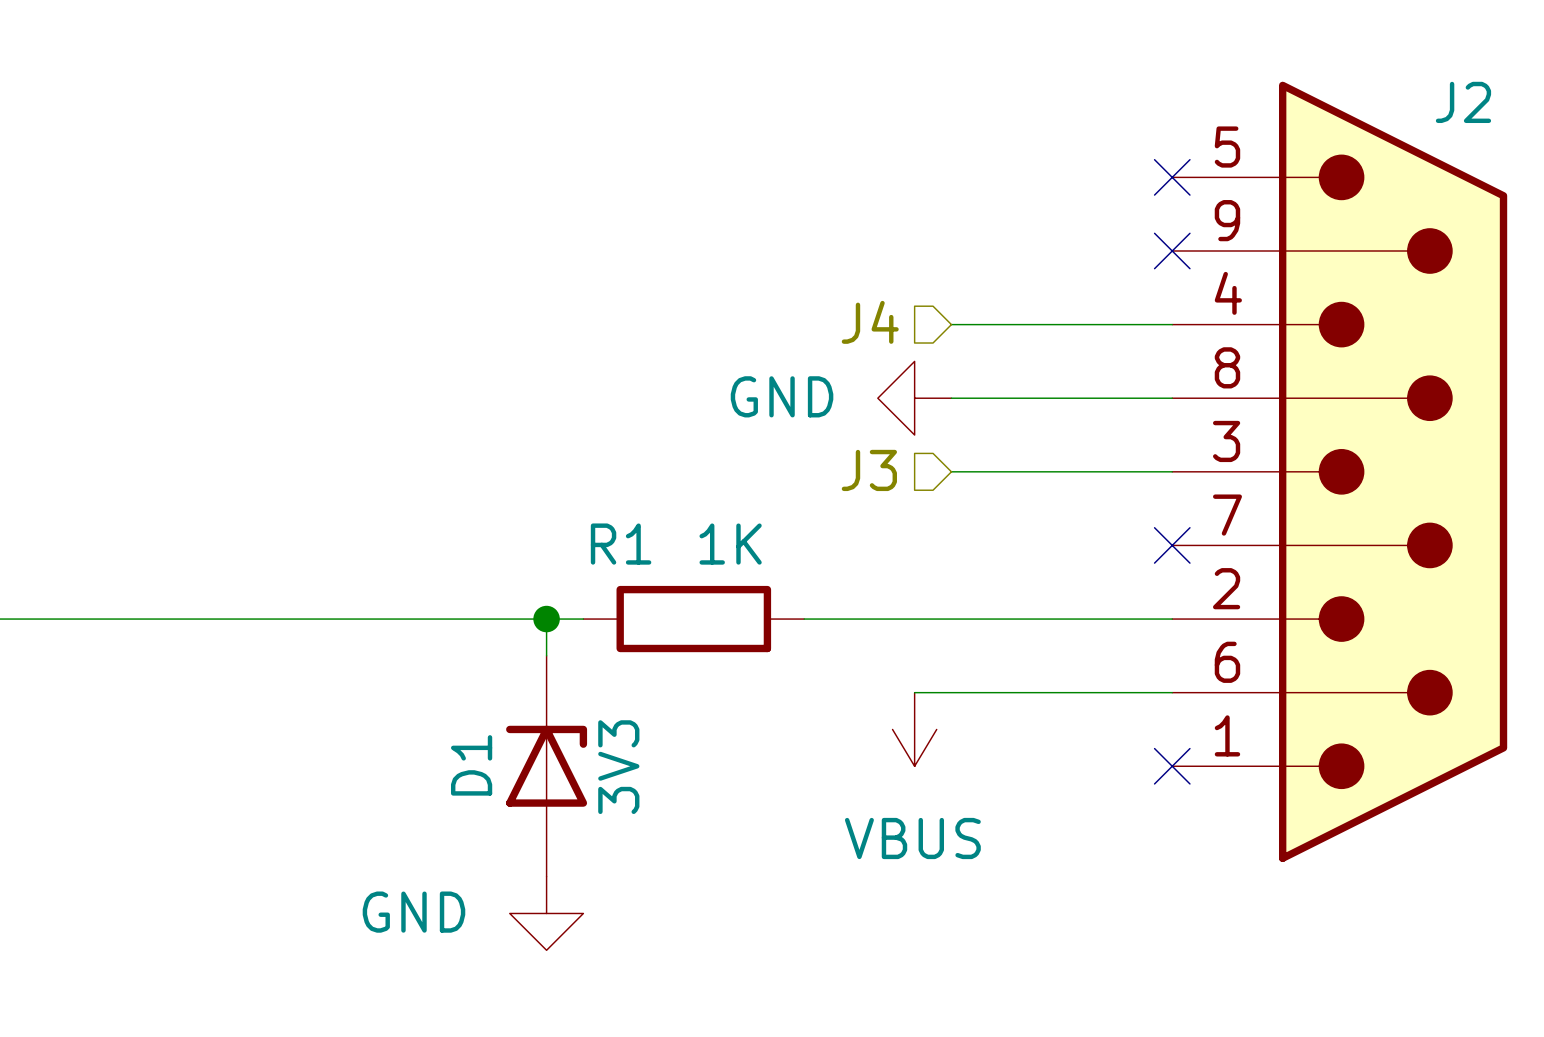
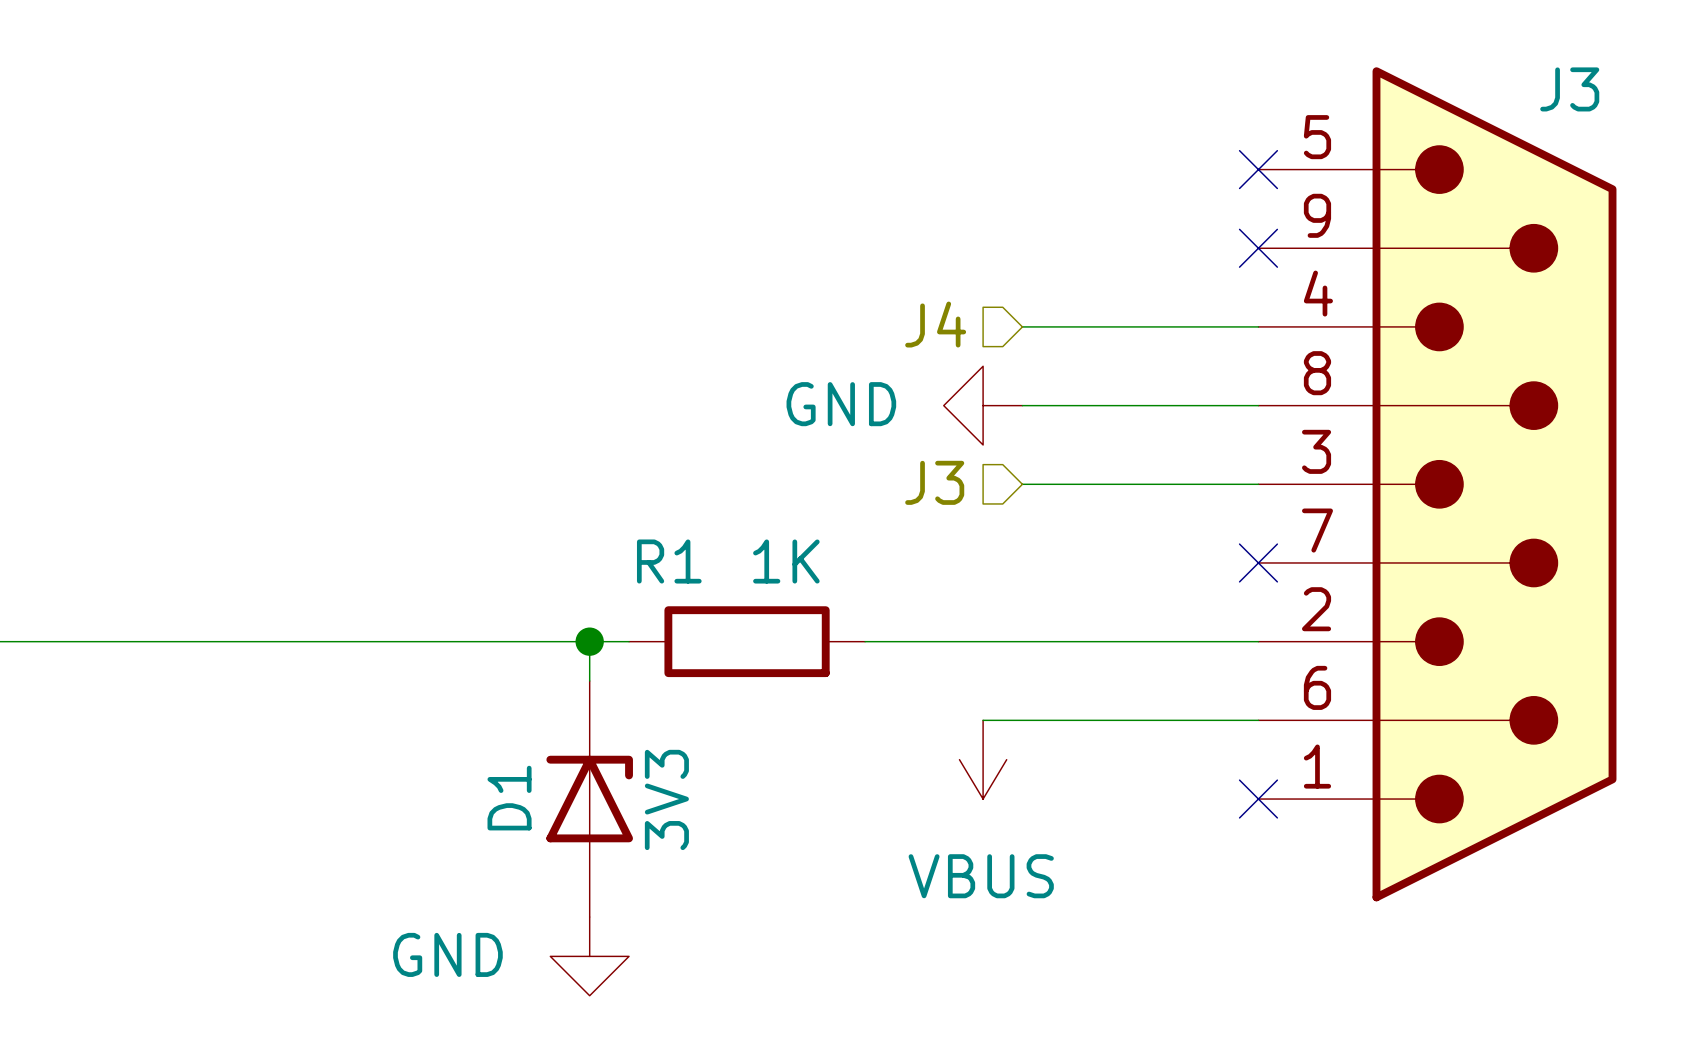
J2 name: J2 (1463, 102) -> J3 (1569, 89)

